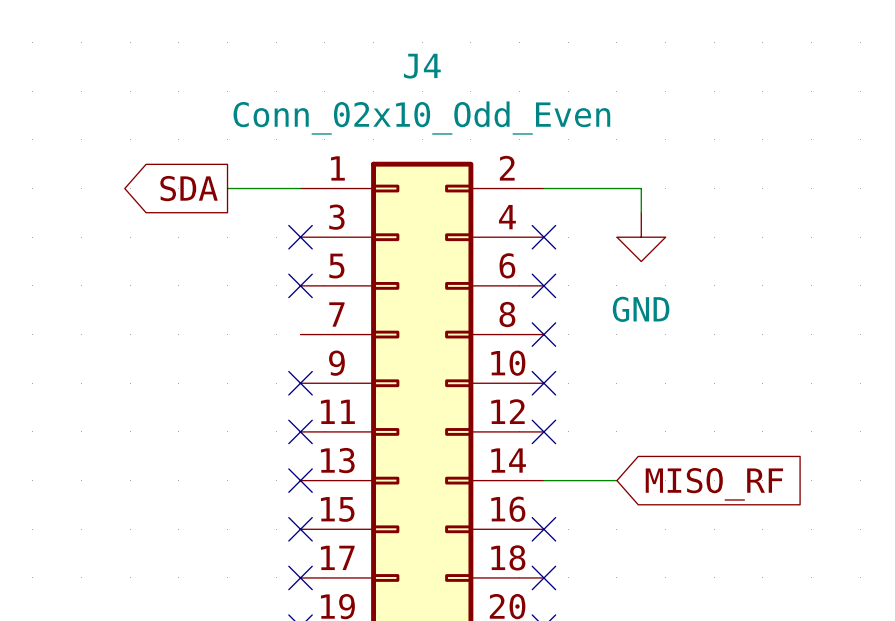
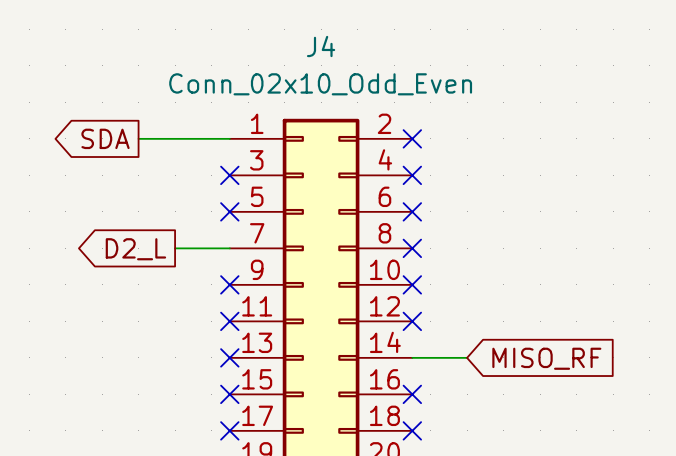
wire: none -> (138, 138) (175, 138)
global label position: SDA (189, 188) -> SDA (105, 138)
wire: (543, 188) (641, 188) (641, 212) -> none
no-connect mark: none -> (412, 138)
power symbol: GND (641, 237) -> none
wire: none -> (175, 248) (229, 248)
global label: none -> D2_L (135, 249)

